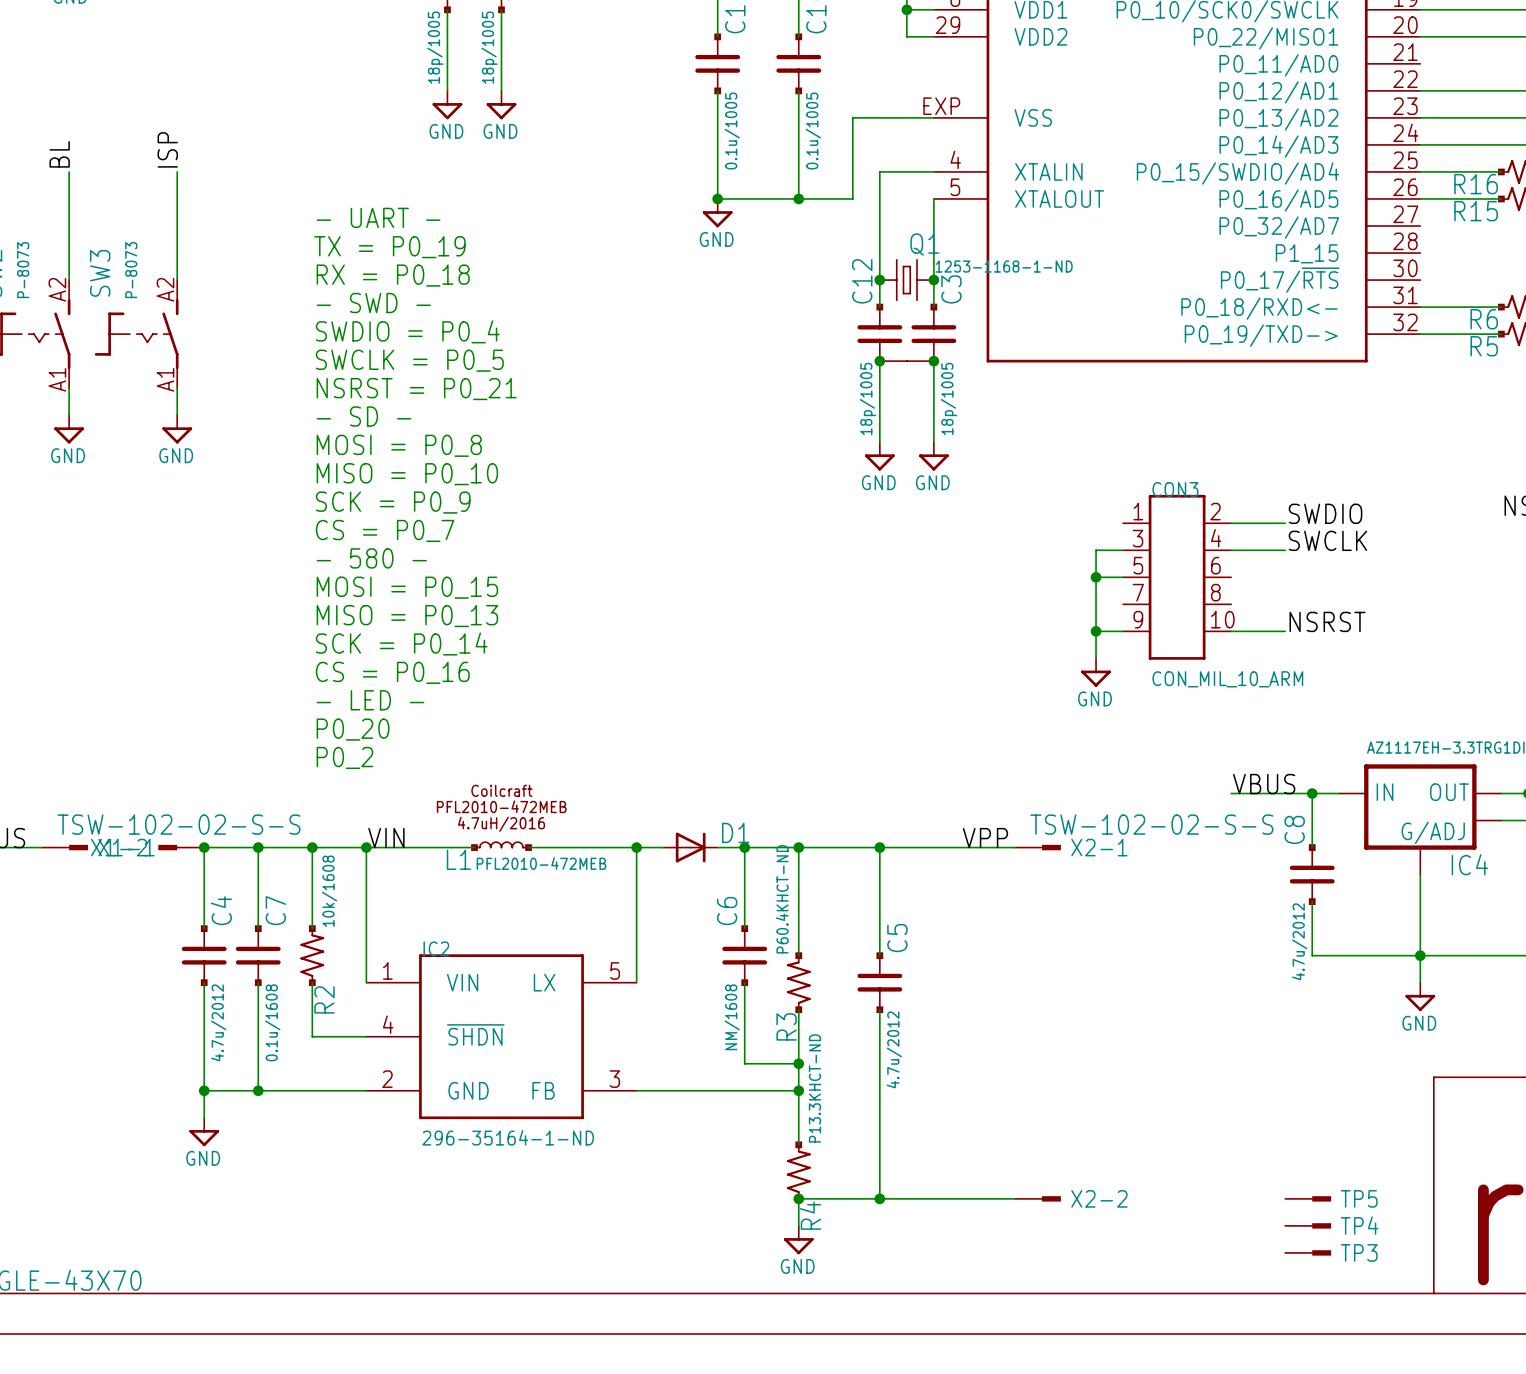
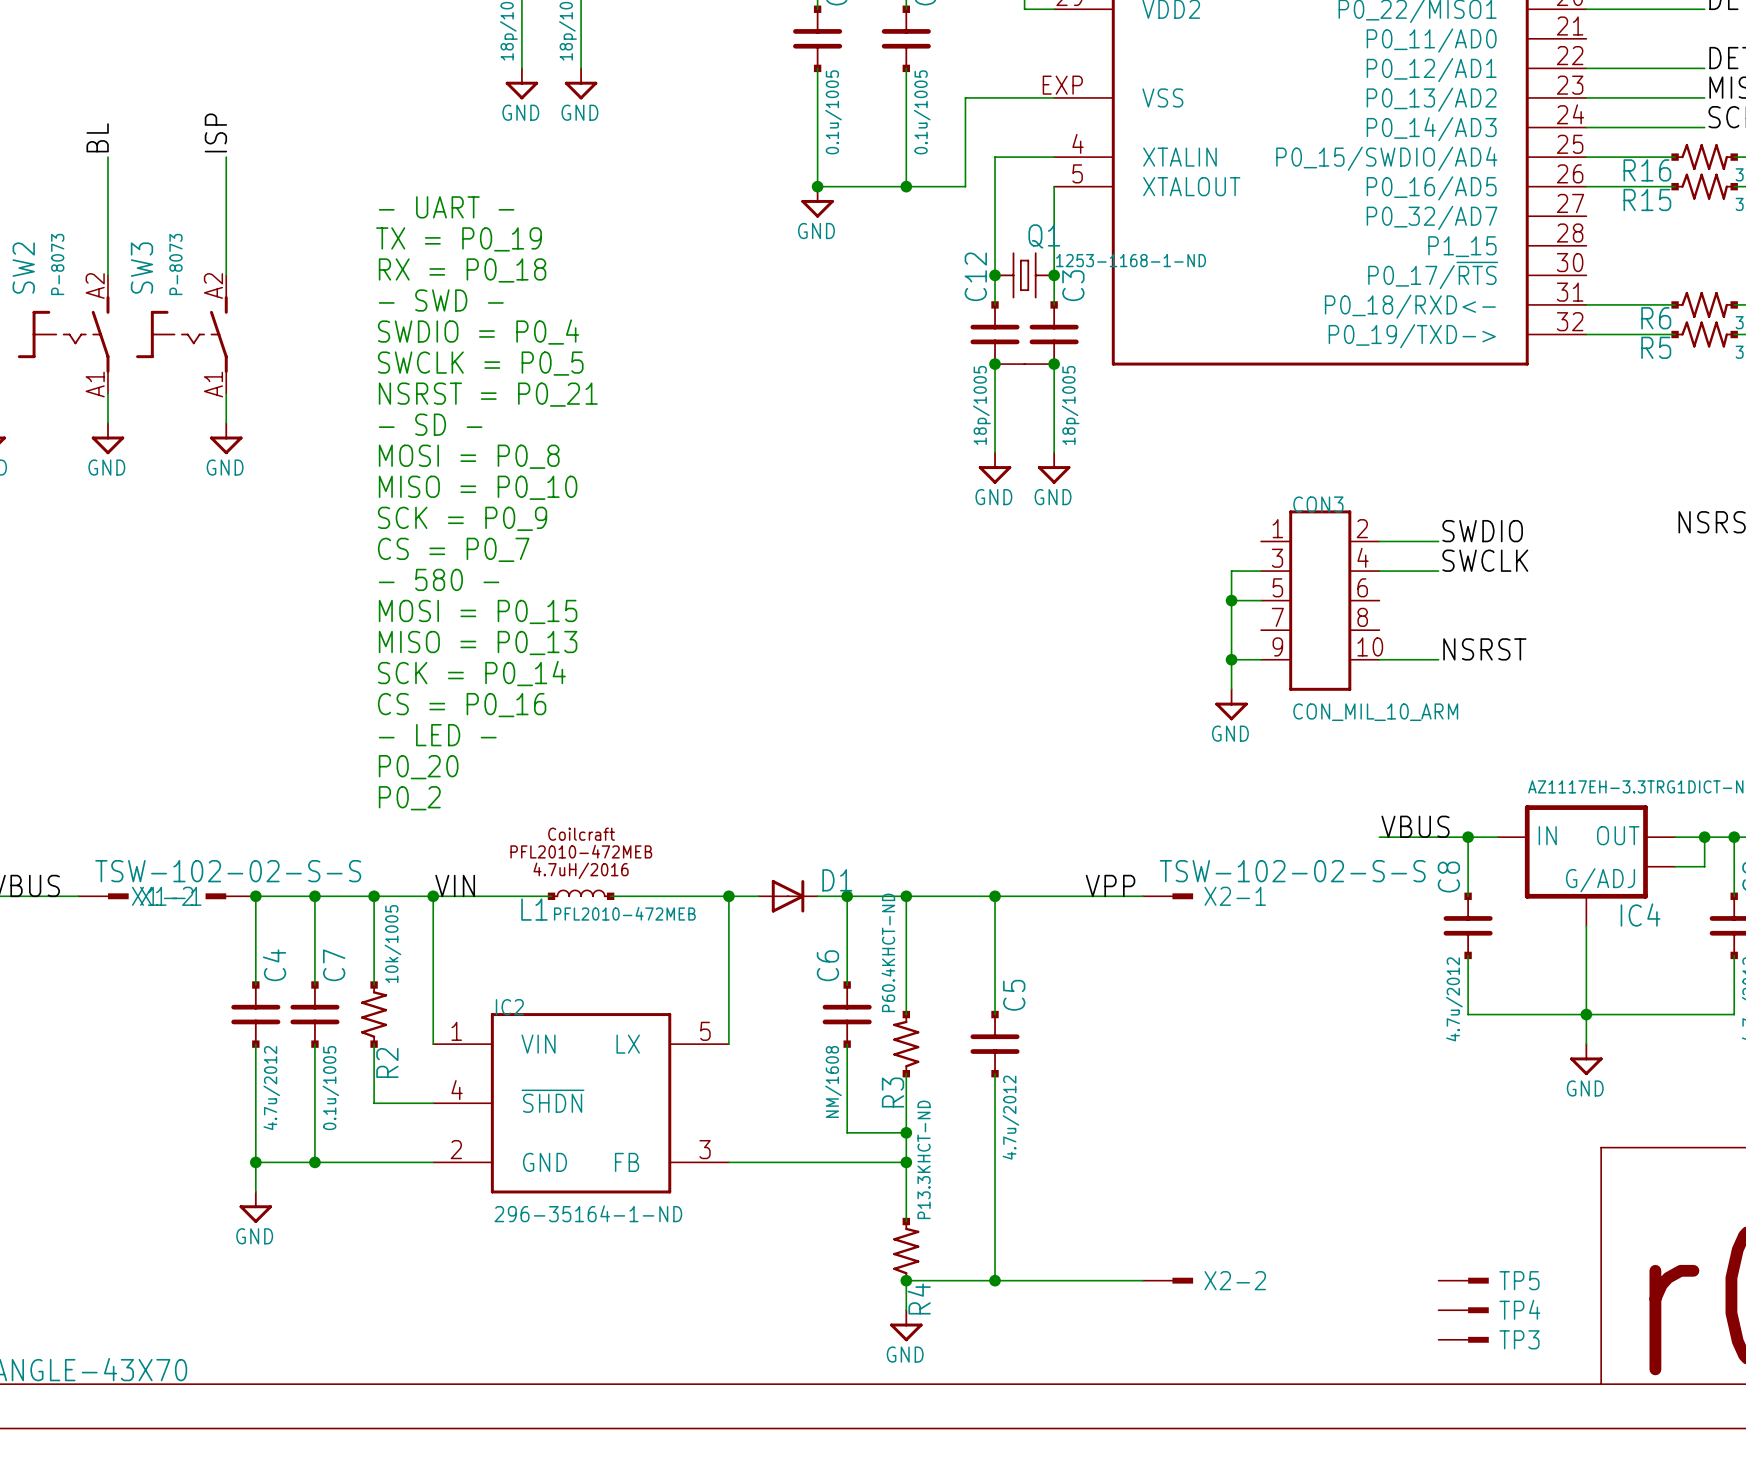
R2 value: 10k/1608 (329, 891) -> 10k/1005 (392, 944)
C7 value: 0.1u/1608 (272, 1022) -> 0.1u/1005 (330, 1088)

